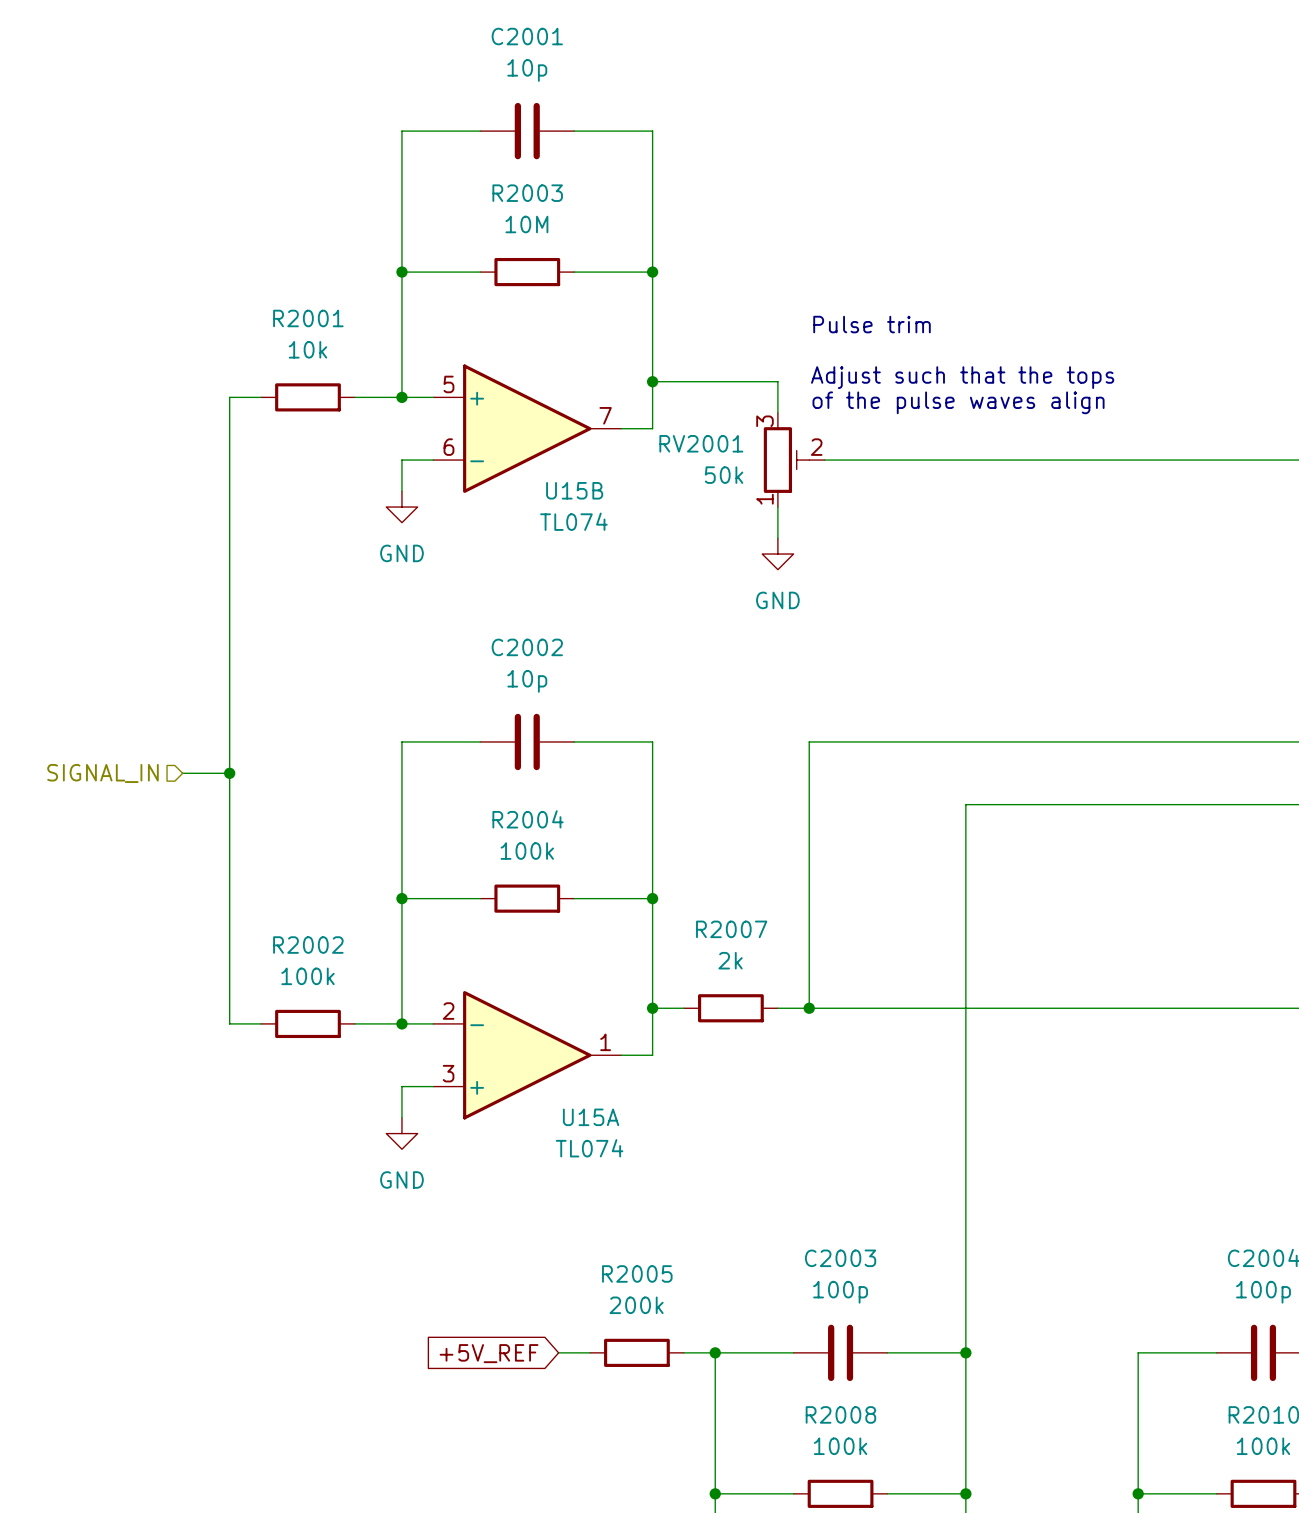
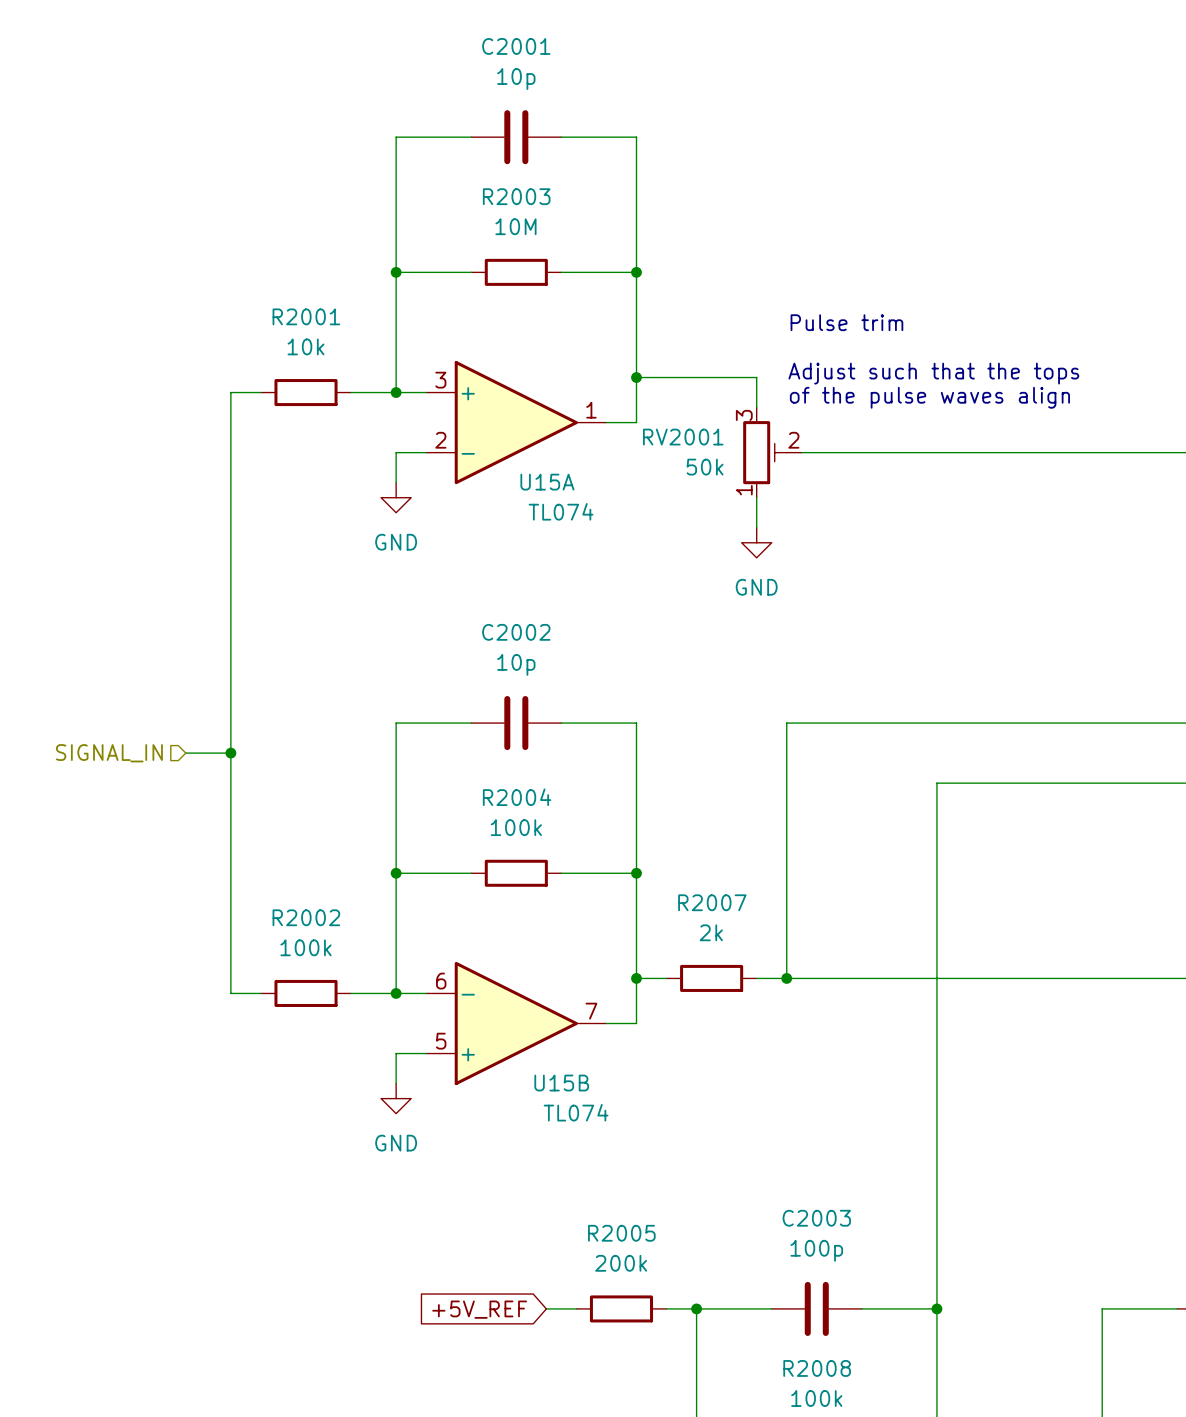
U15B flip: as is (527, 428) -> up-down (516, 1023)
U15B position: (527, 428) -> (516, 1023)
U15A flip: as is (527, 1055) -> up-down (516, 422)
U15A position: (527, 1055) -> (516, 422)
U15A name position: U15A (591, 1117) -> U15A (547, 482)

